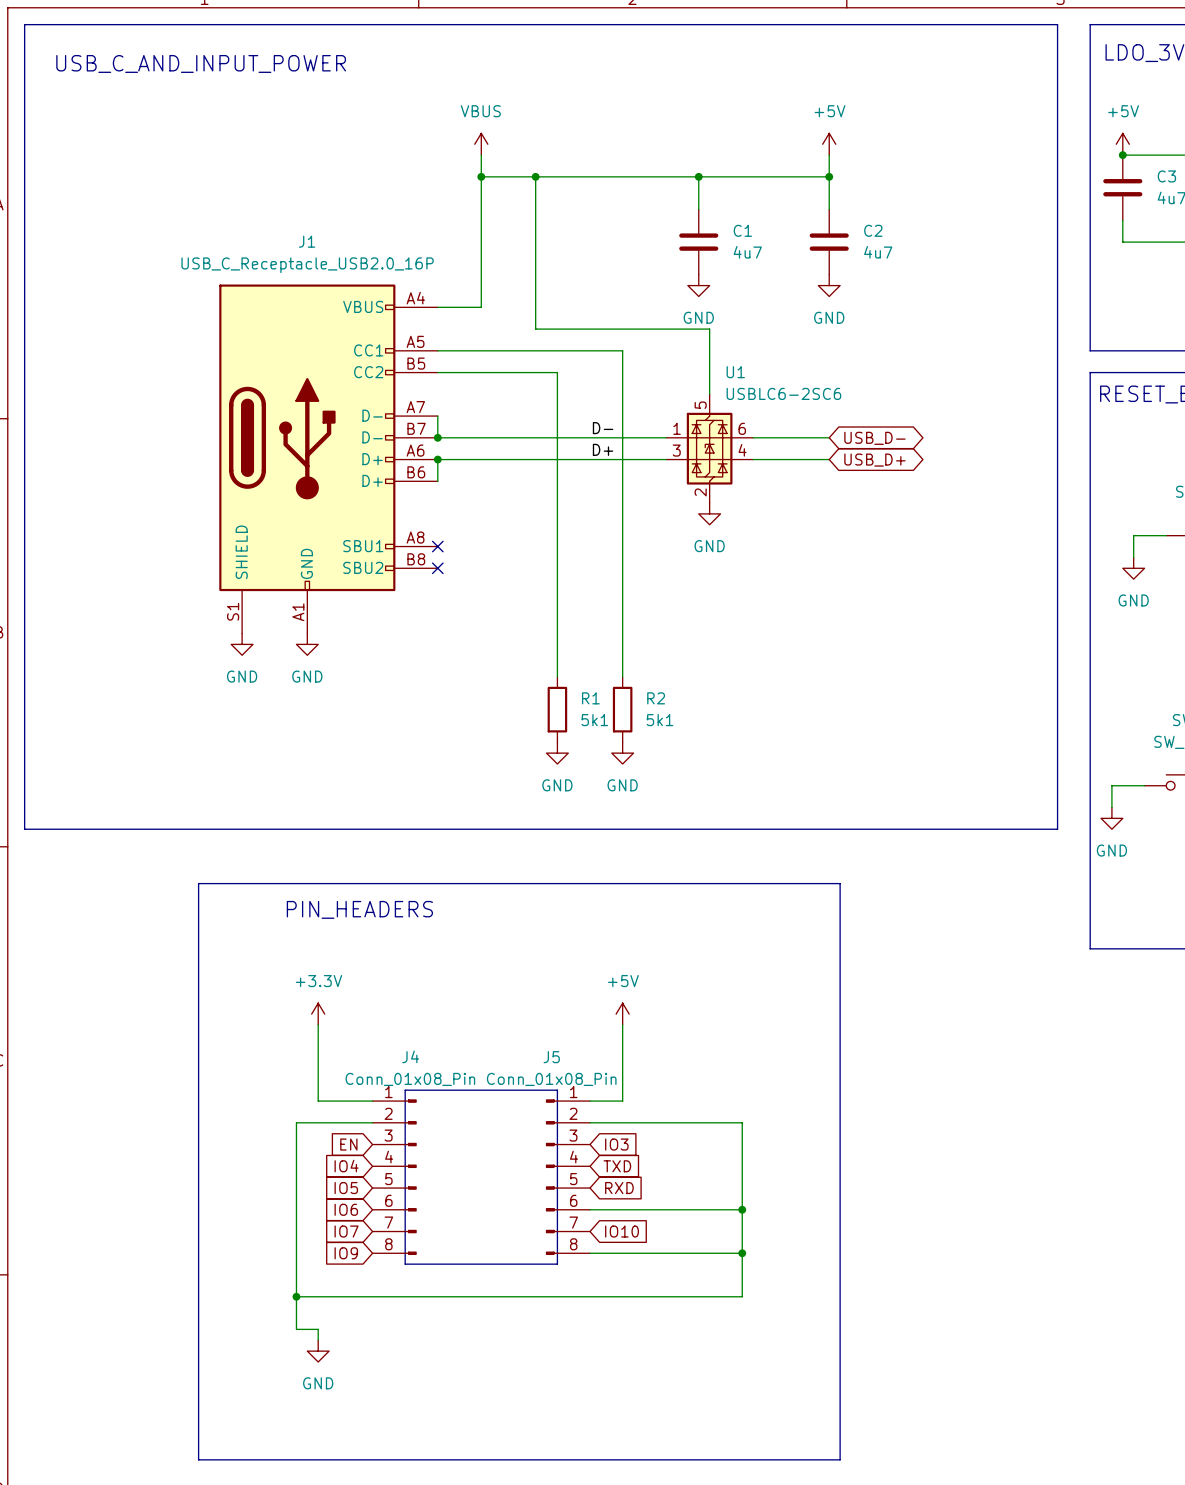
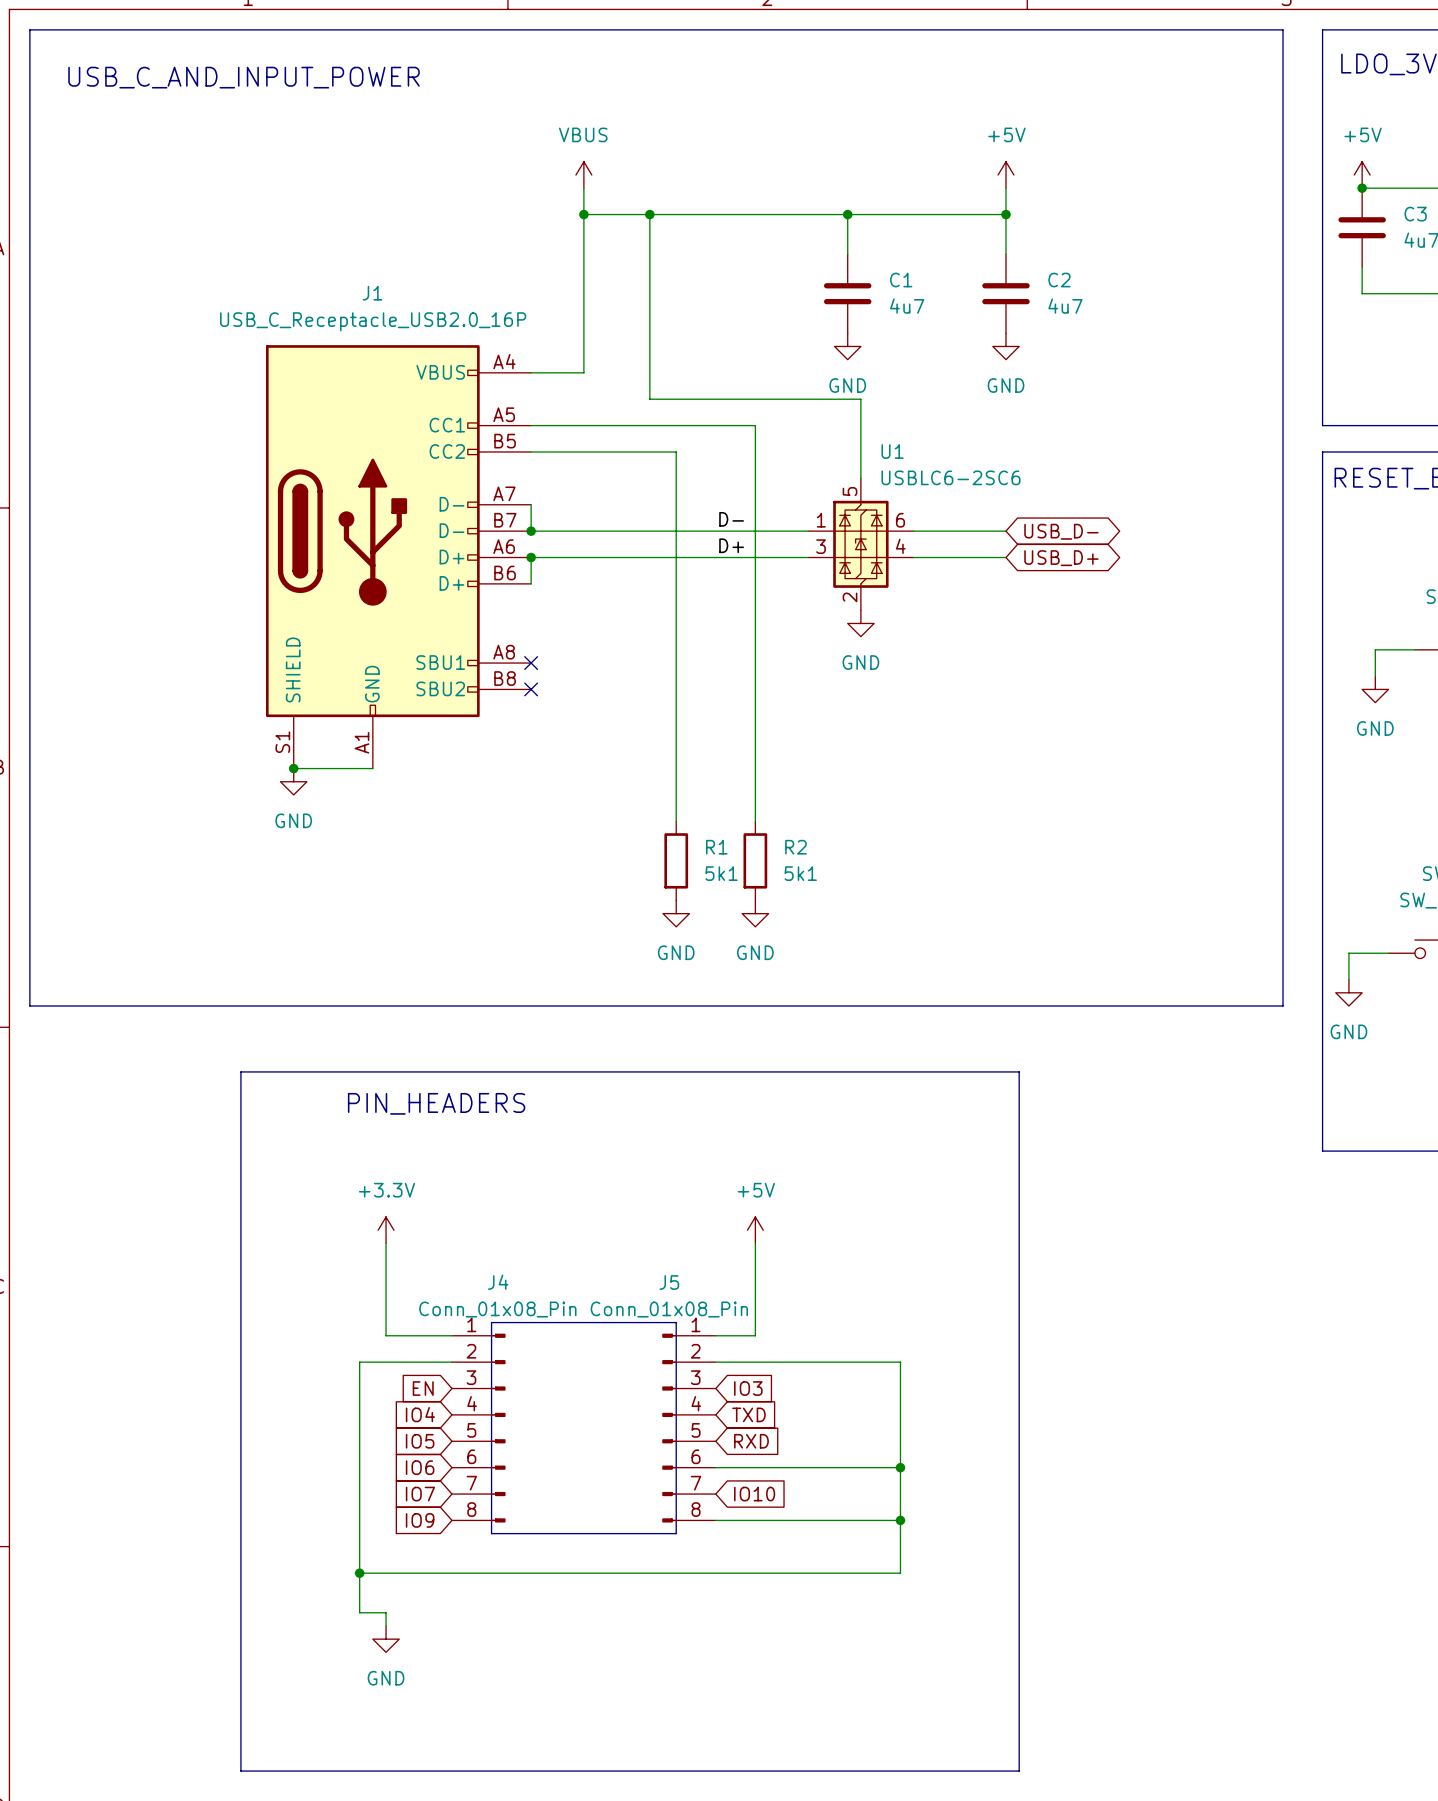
wire: none -> (293, 768) (372, 768)
junction: none -> (293, 768)
power symbol: GND (307, 644) -> none

